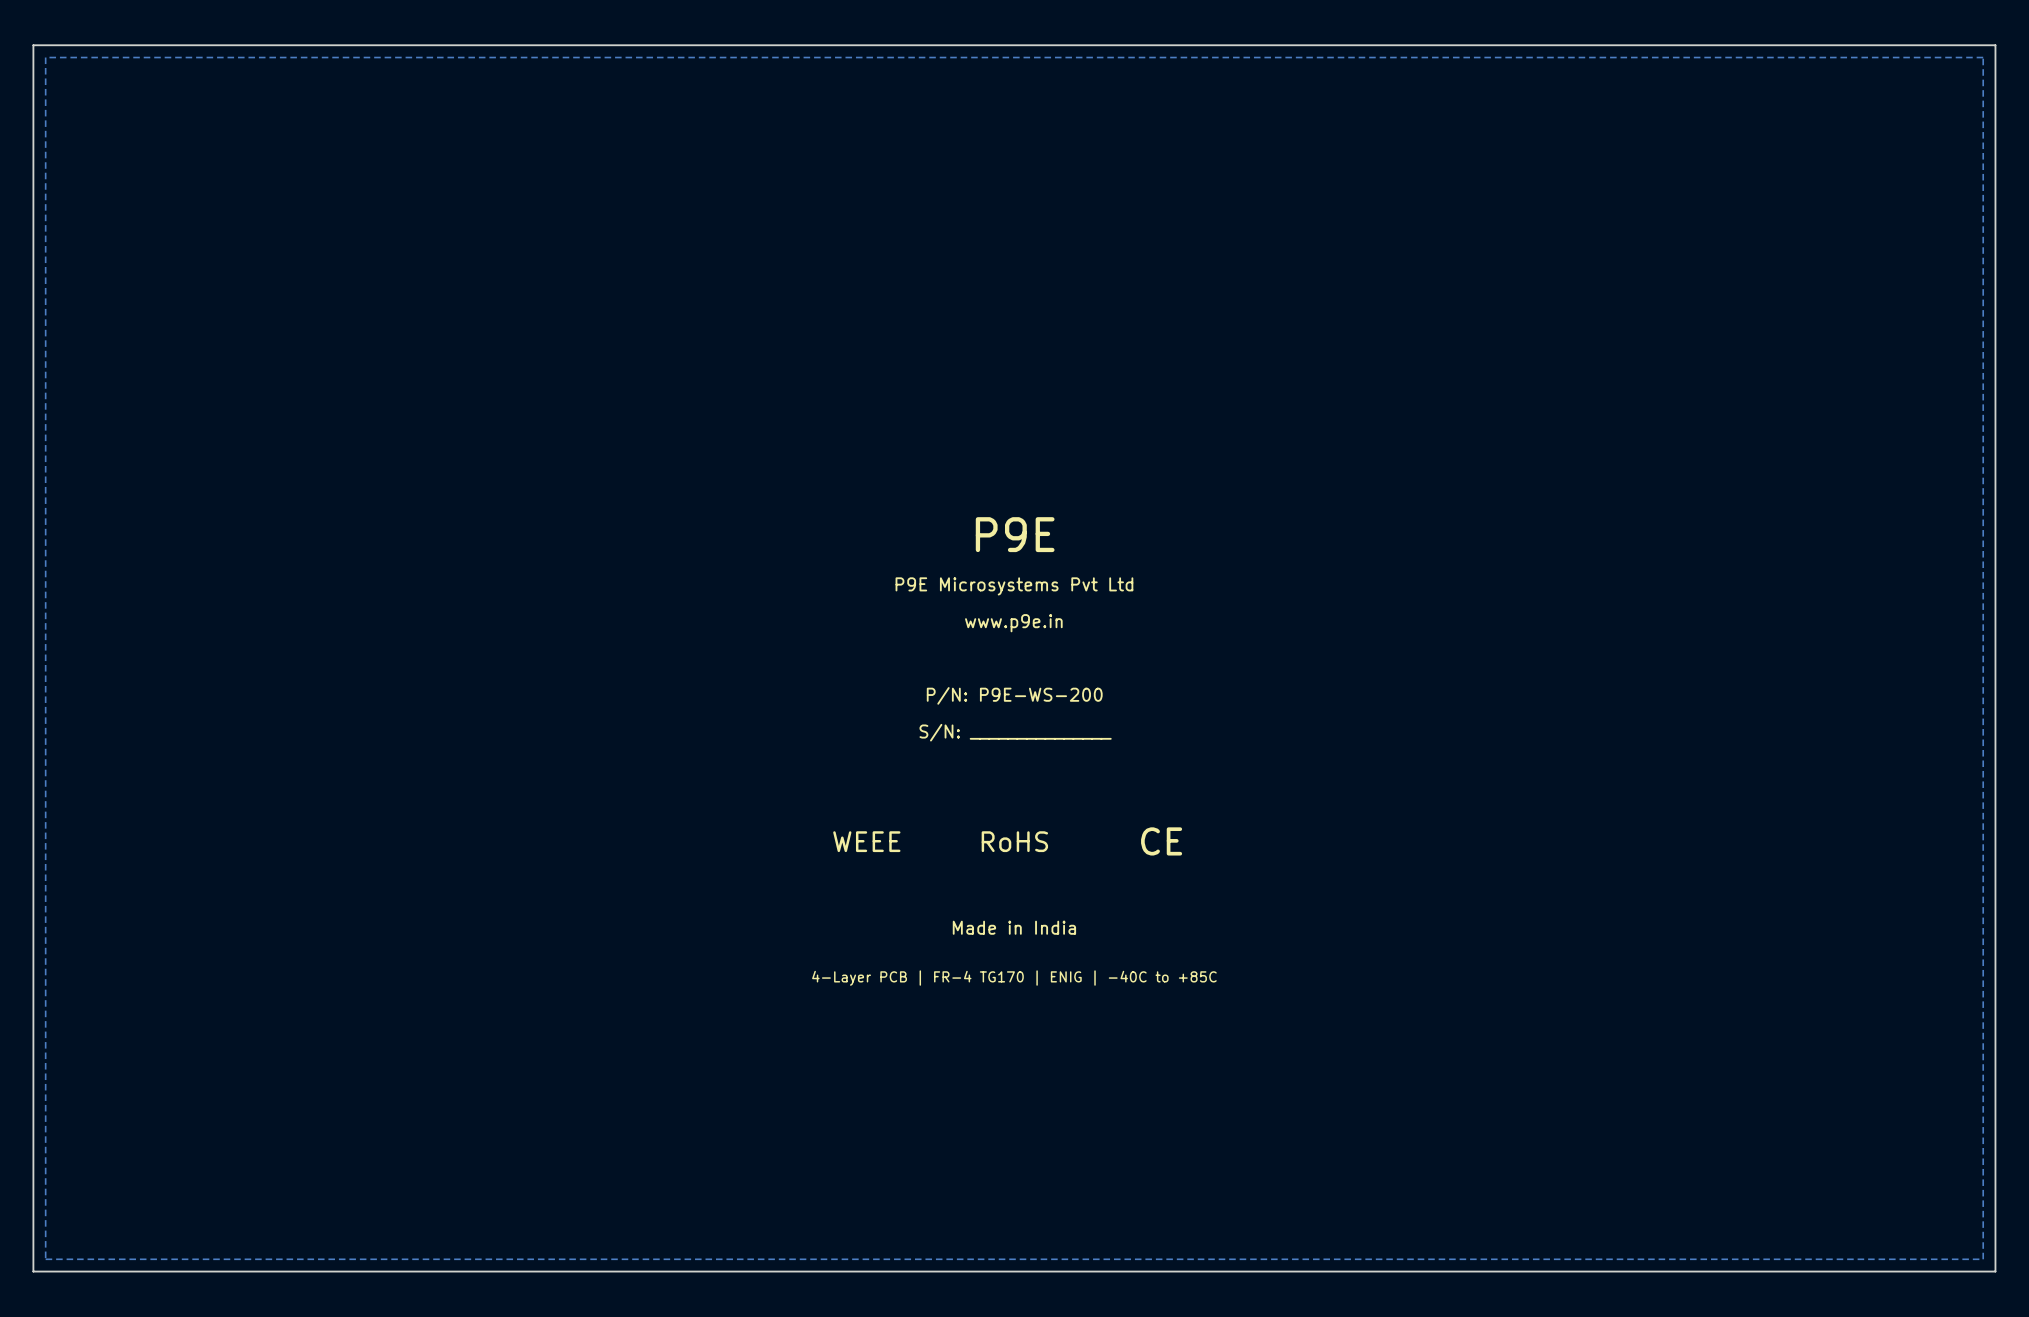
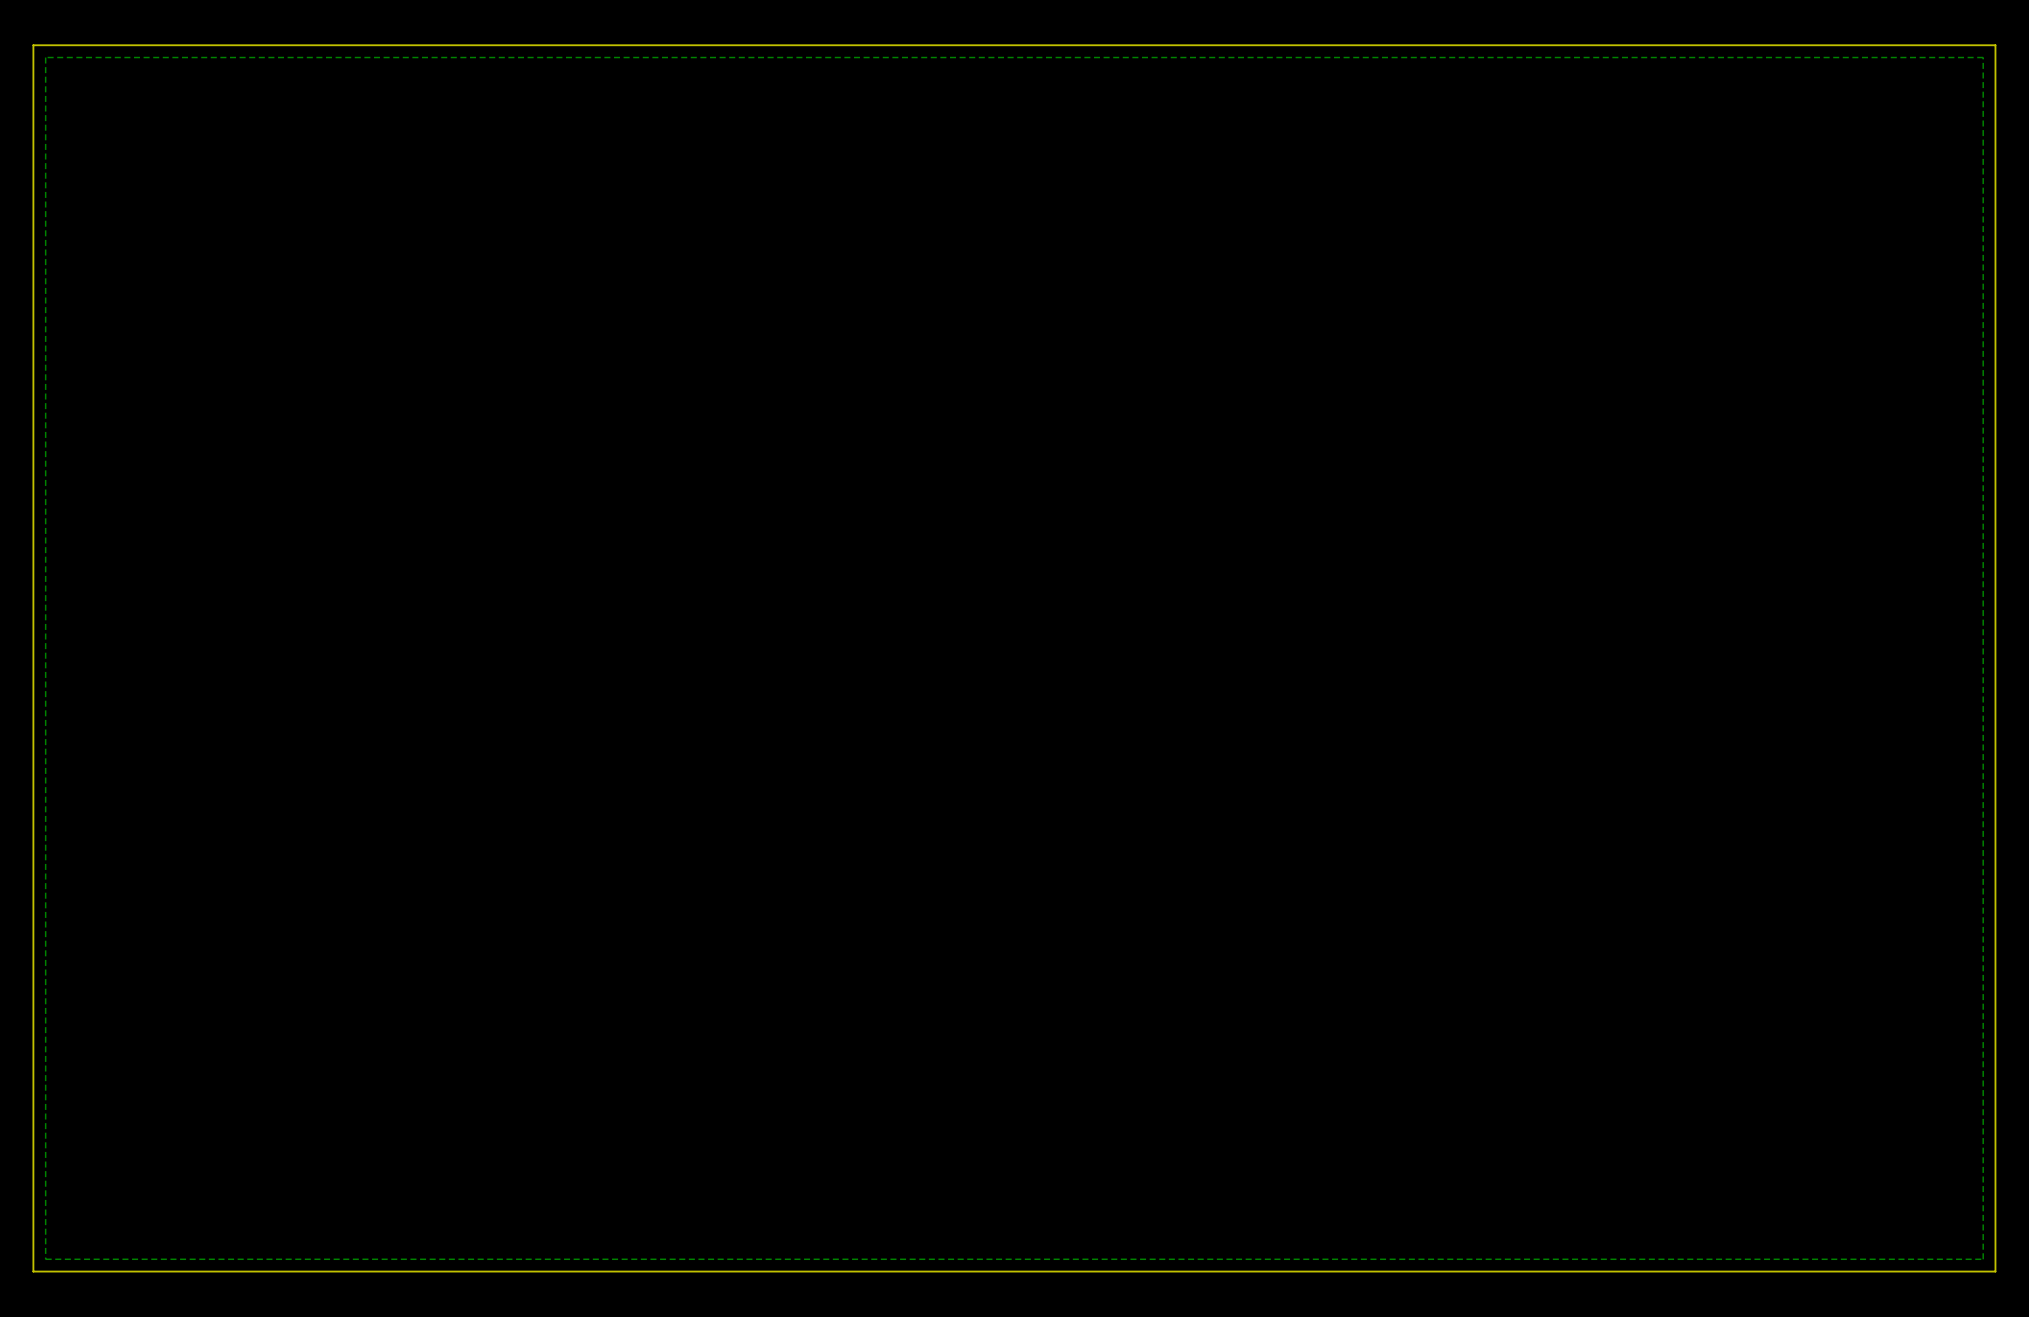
text: P9E (1015, 534) -> none
text: P9E Microsystems Pvt Ltd (1014, 586) -> none
text: www.p9e.in (1013, 623) -> none
text: P/N: P9E-WS-200 (1014, 695) -> none
text: S/N: _______________ (1015, 732) -> none
text: WEEE (866, 841) -> none
text: RoHS (1014, 841) -> none
text: CE (1161, 841) -> none
text: Made in India (1014, 927) -> none
text: 4-Layer PCB | FR-4 TG170 | ENIG | -40C to +85C (1014, 978) -> none

